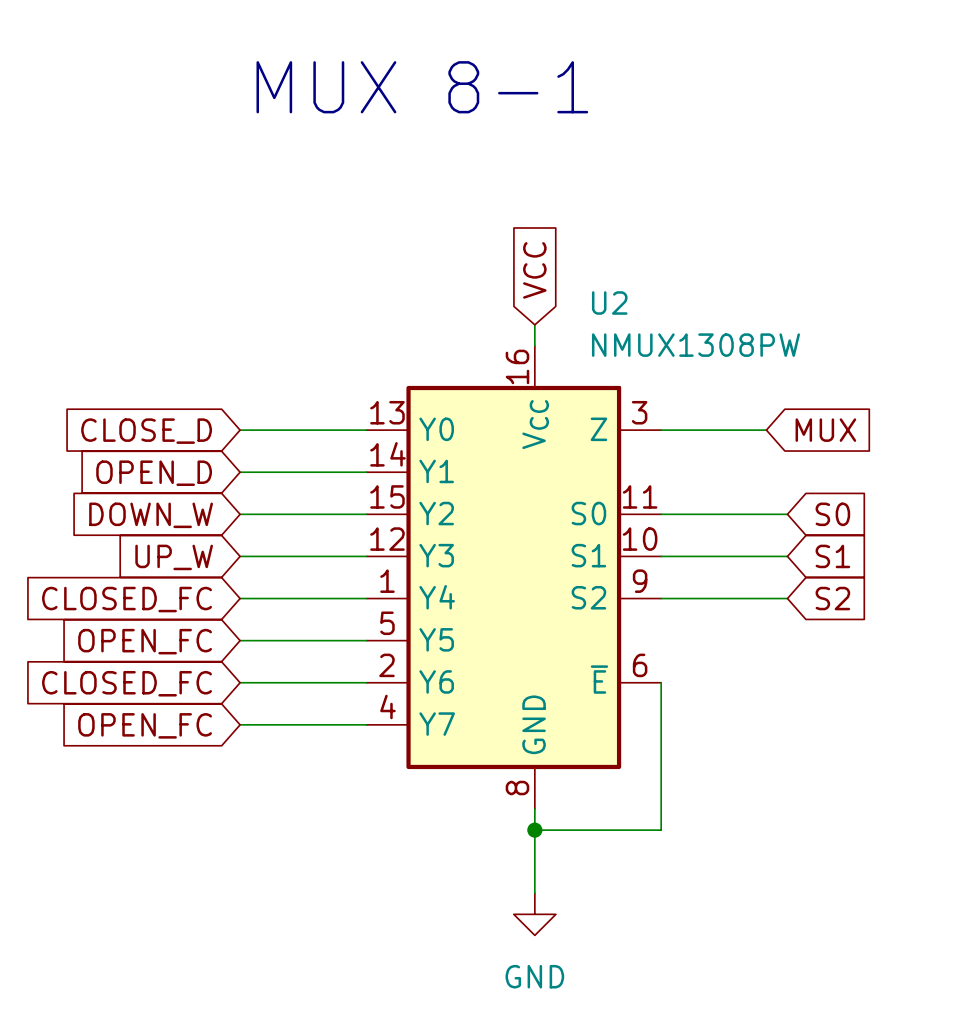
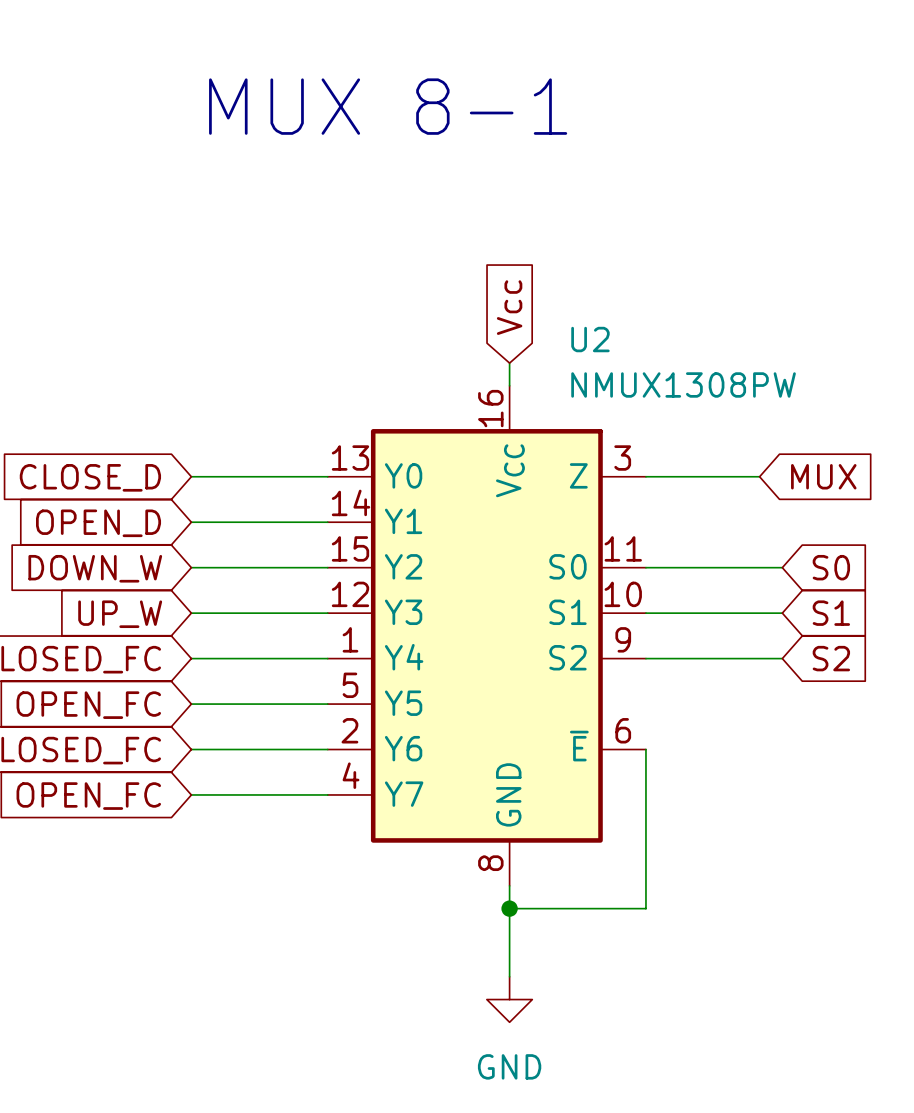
global label: VCC (534, 270) -> Vcc (509, 307)

